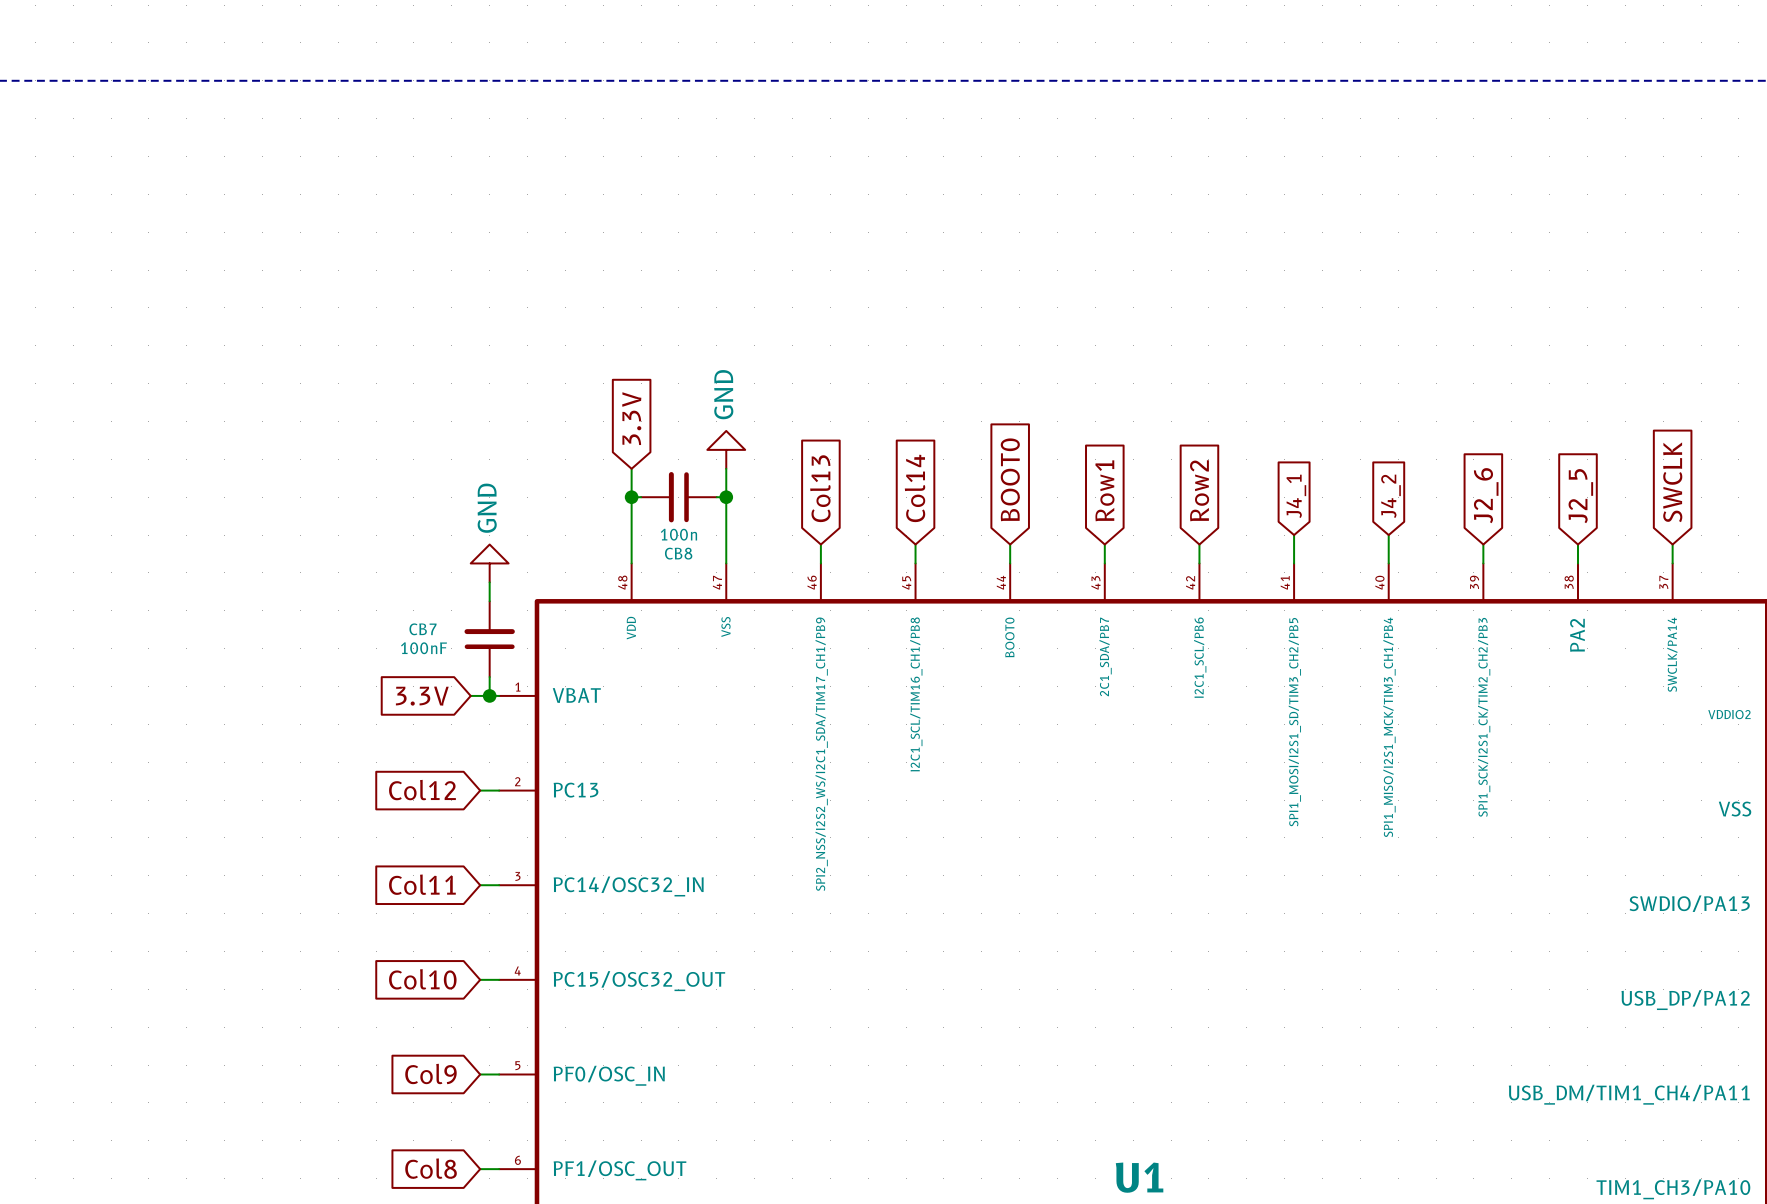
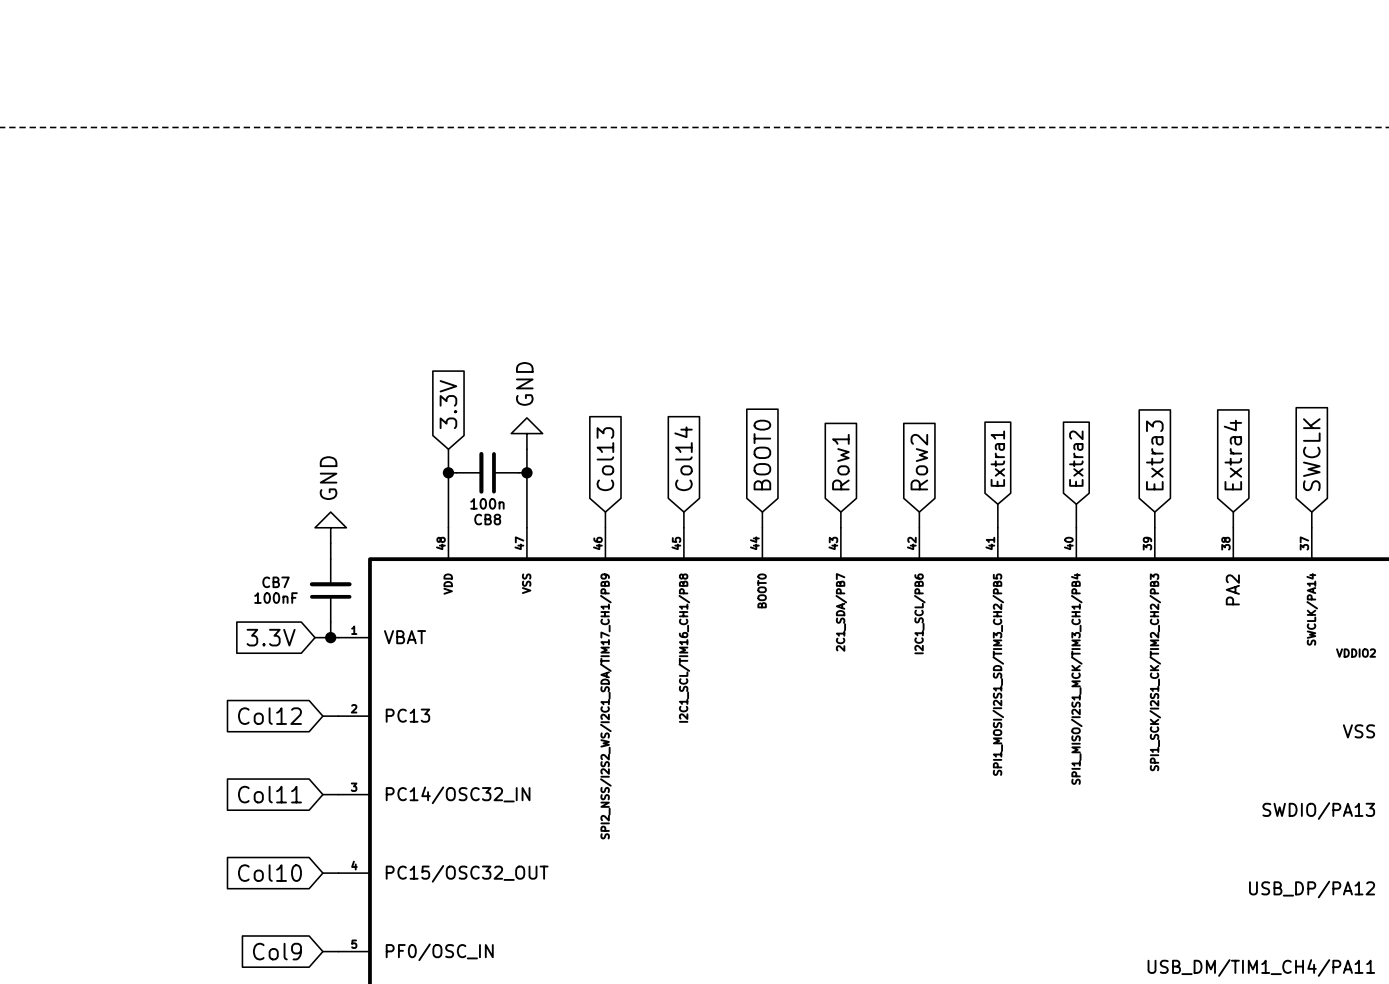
global label: J2_6 (1486, 495) -> Extra3 (1154, 455)
global label: J4_1 (1296, 496) -> Extra1 (997, 458)
global label: J4_2 (1390, 496) -> Extra2 (1076, 458)
global label: J2_5 (1580, 496) -> Extra4 (1232, 455)

